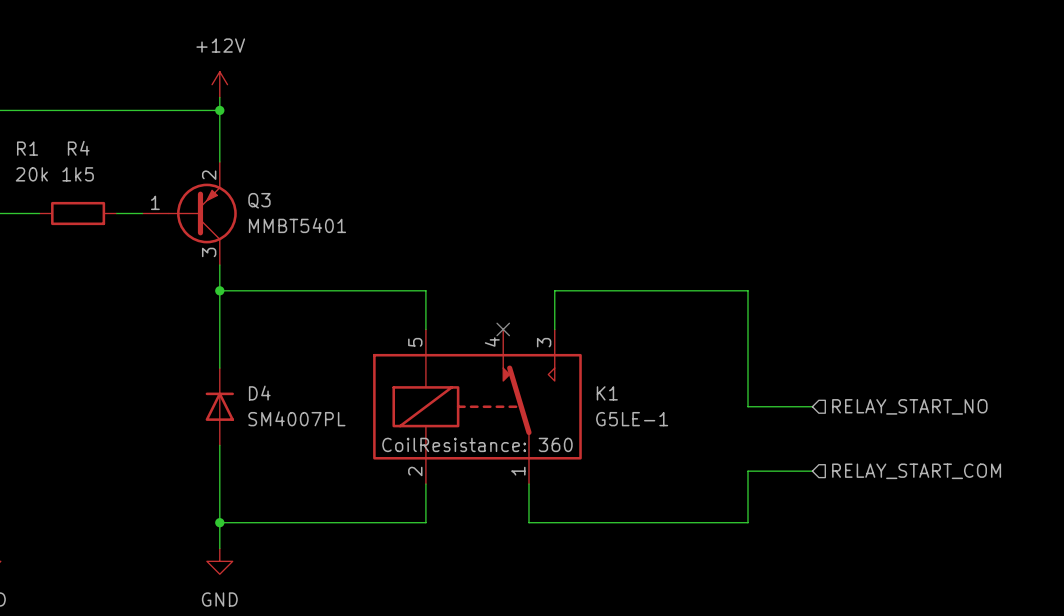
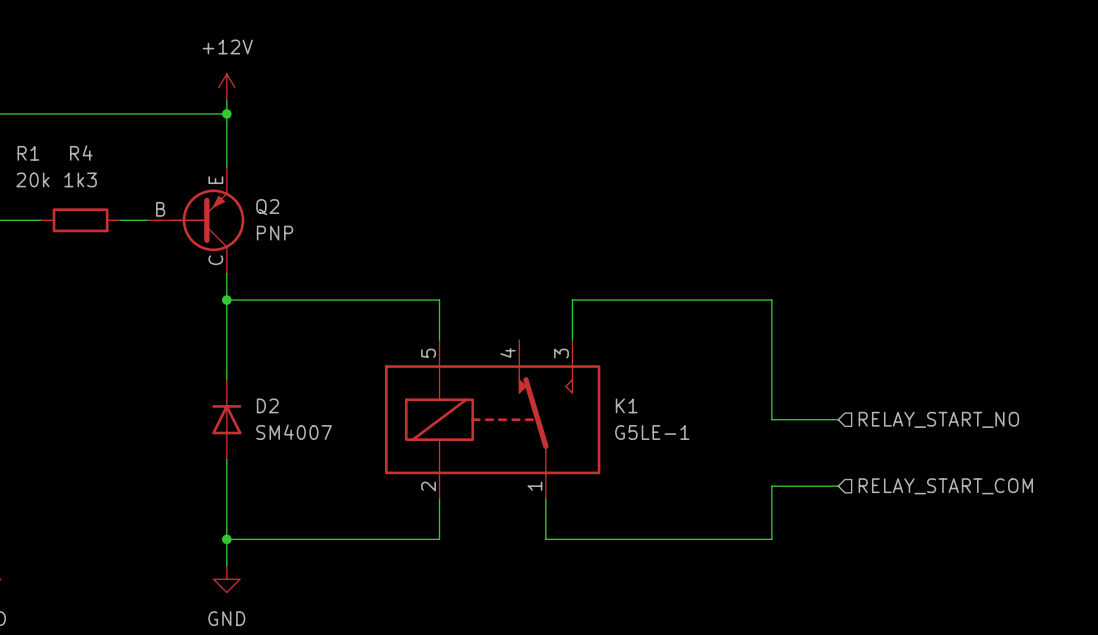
R4 value: 1k5 (78, 174) -> 1k3 (80, 179)
Q3: MMBT5401 (189, 213) -> none
Q2: none -> PNP (195, 220)
no-connect mark: (503, 329) -> none
D4 name: D4 (259, 393) -> D2 (267, 405)
D4 value: SM4007PL (296, 418) -> SM4007 (294, 432)
K1 text: CoilResistance: 360 (477, 444) -> none

